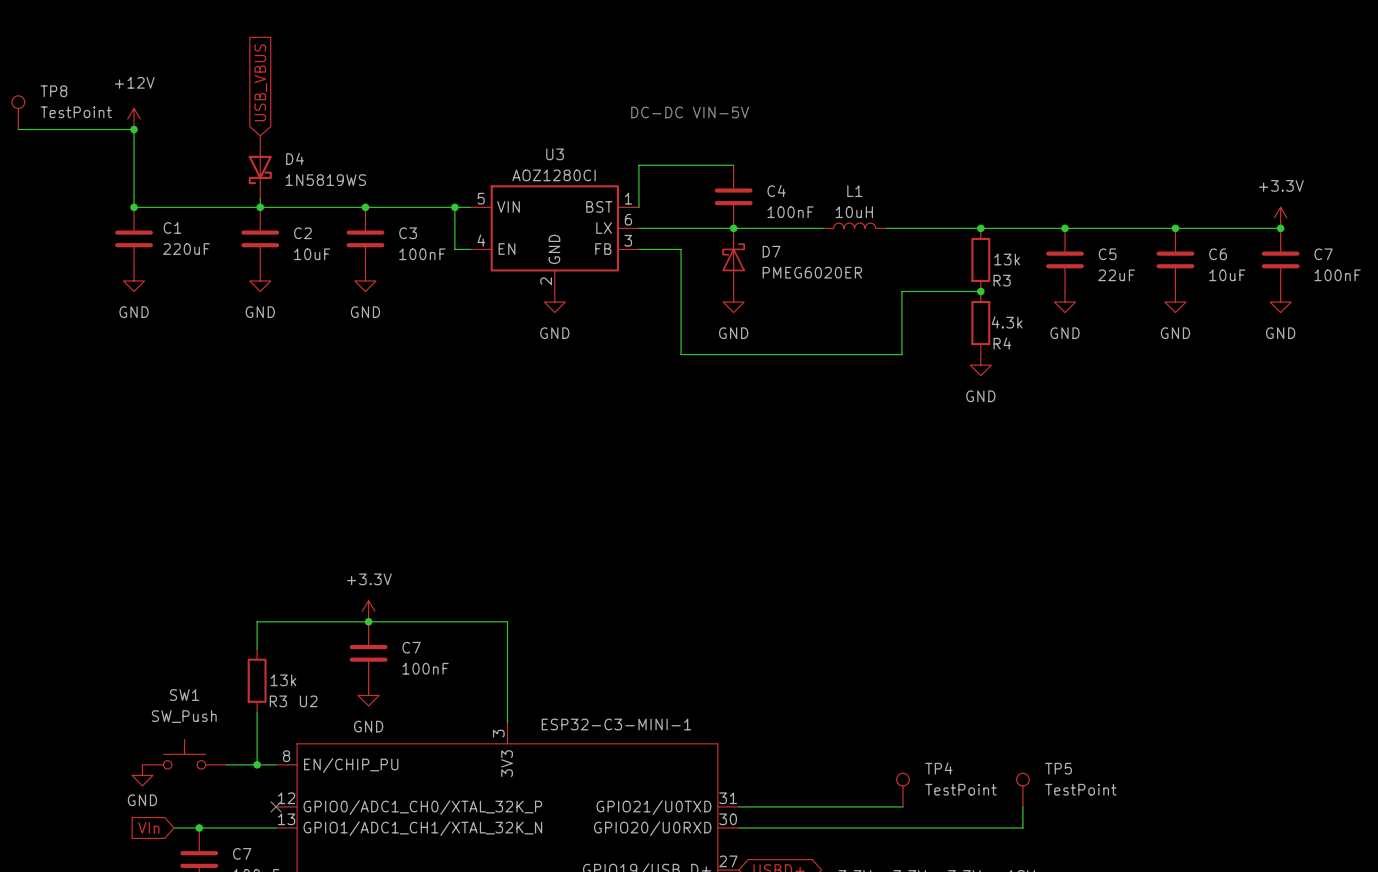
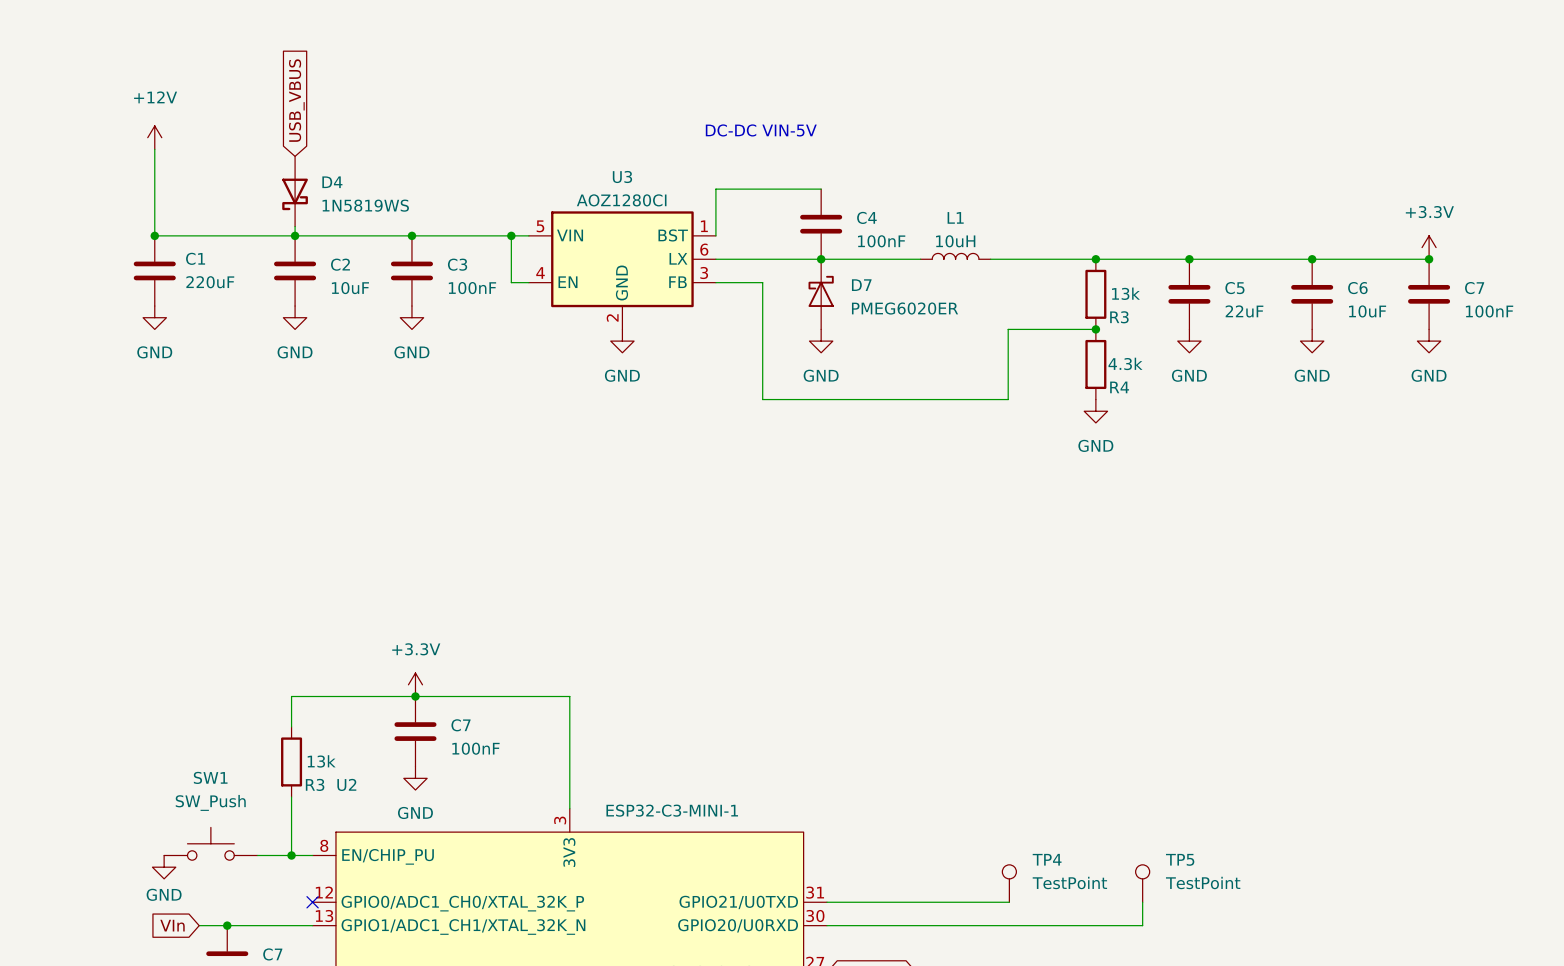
TP8: TestPoint (18, 112) -> none
wire: (18, 129) (134, 129) -> none
junction: (134, 129) -> none

